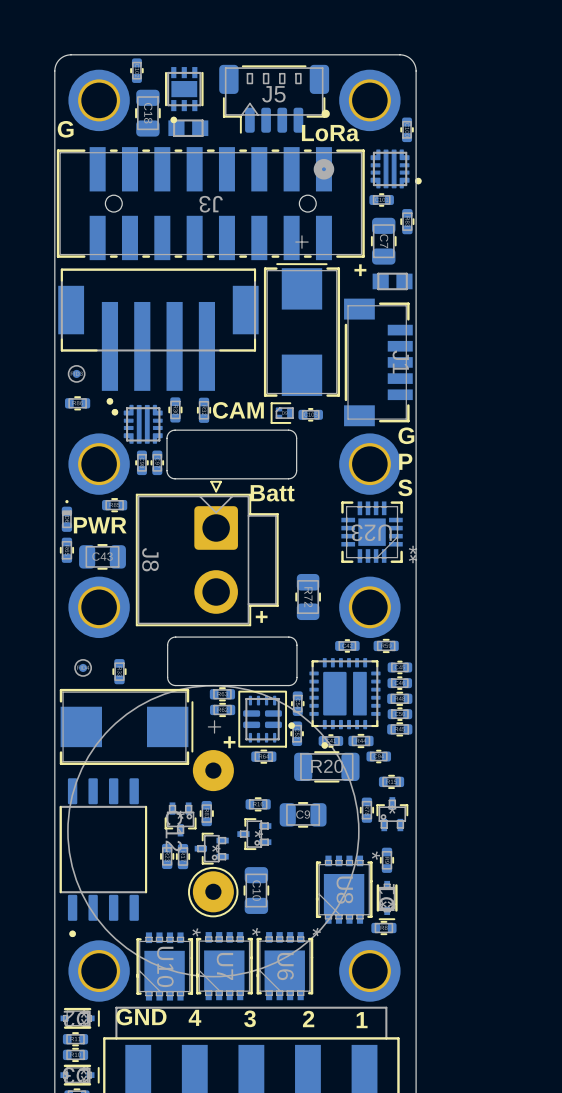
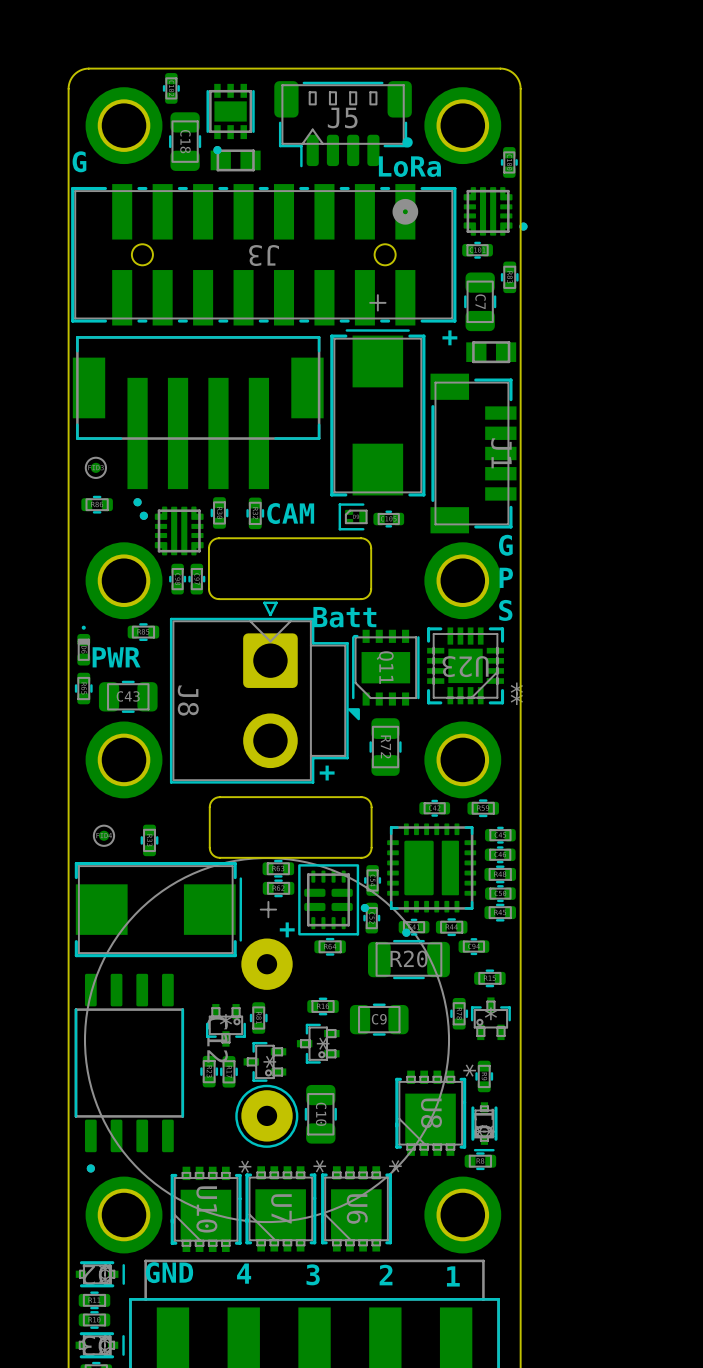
Q11: none -> (383, 675)

